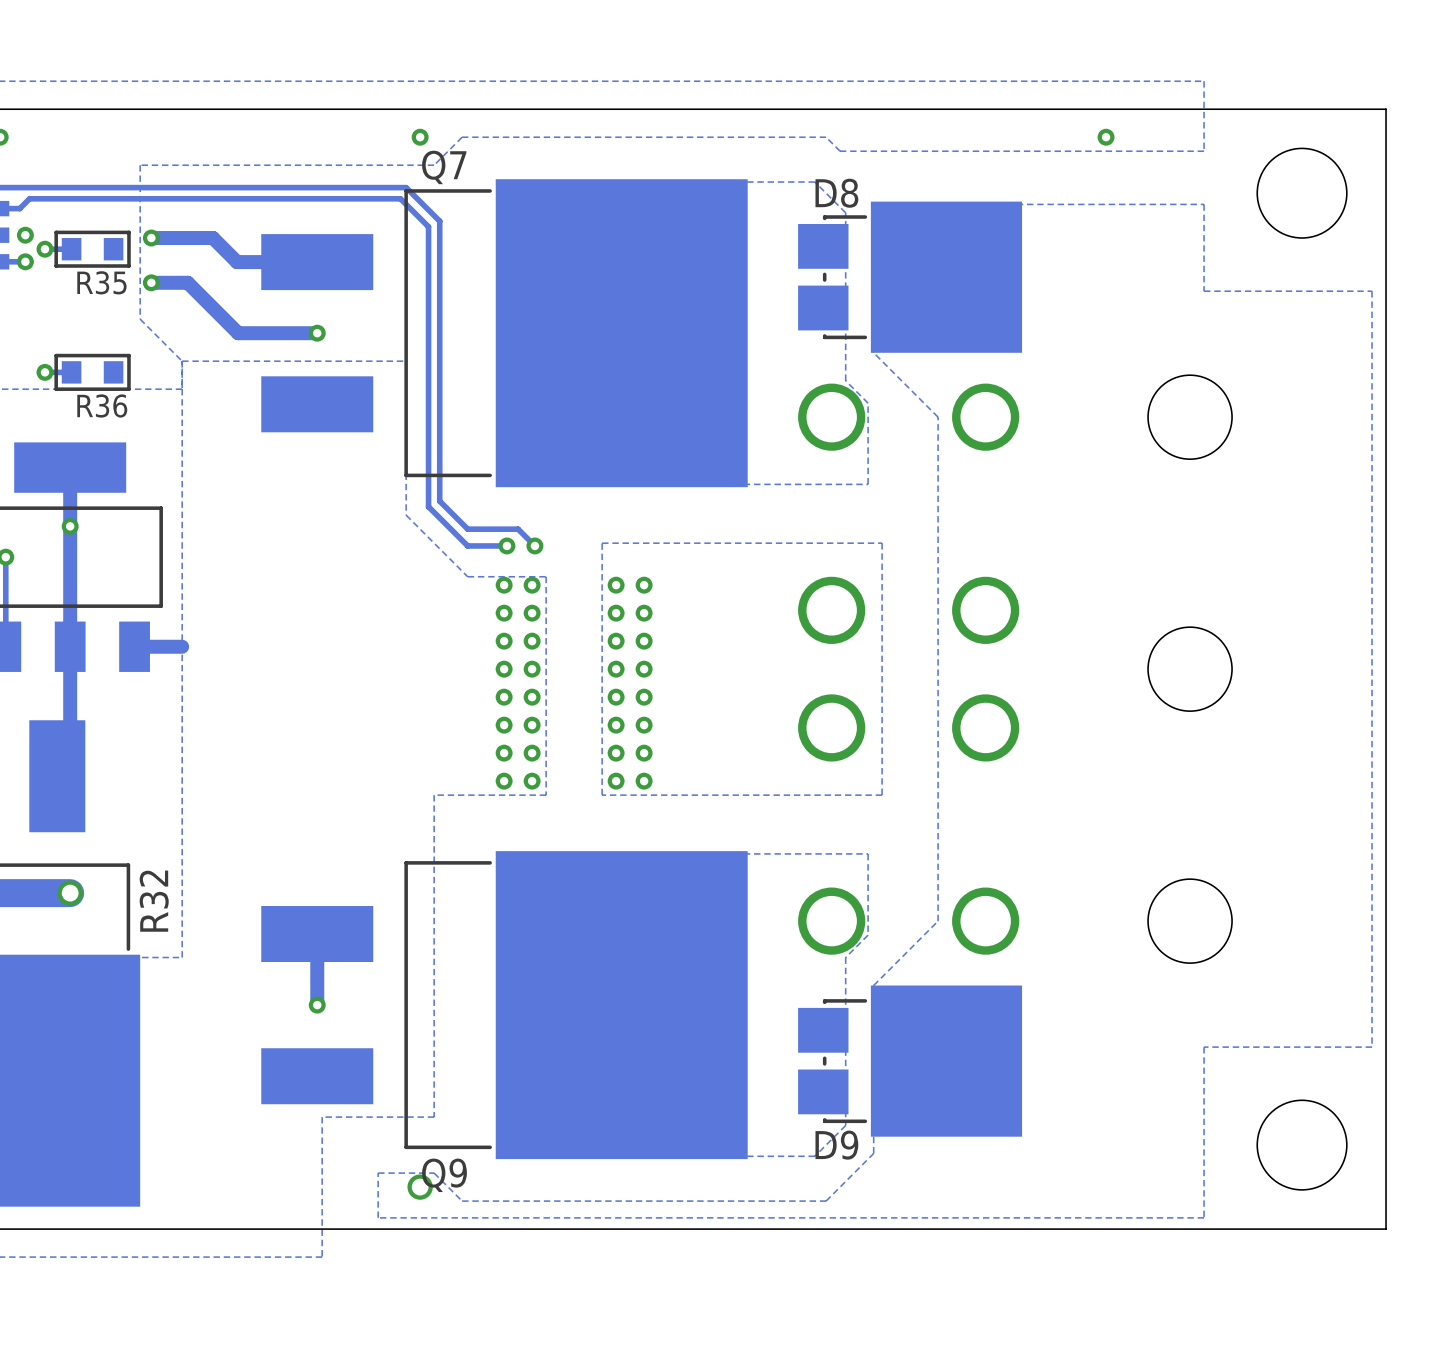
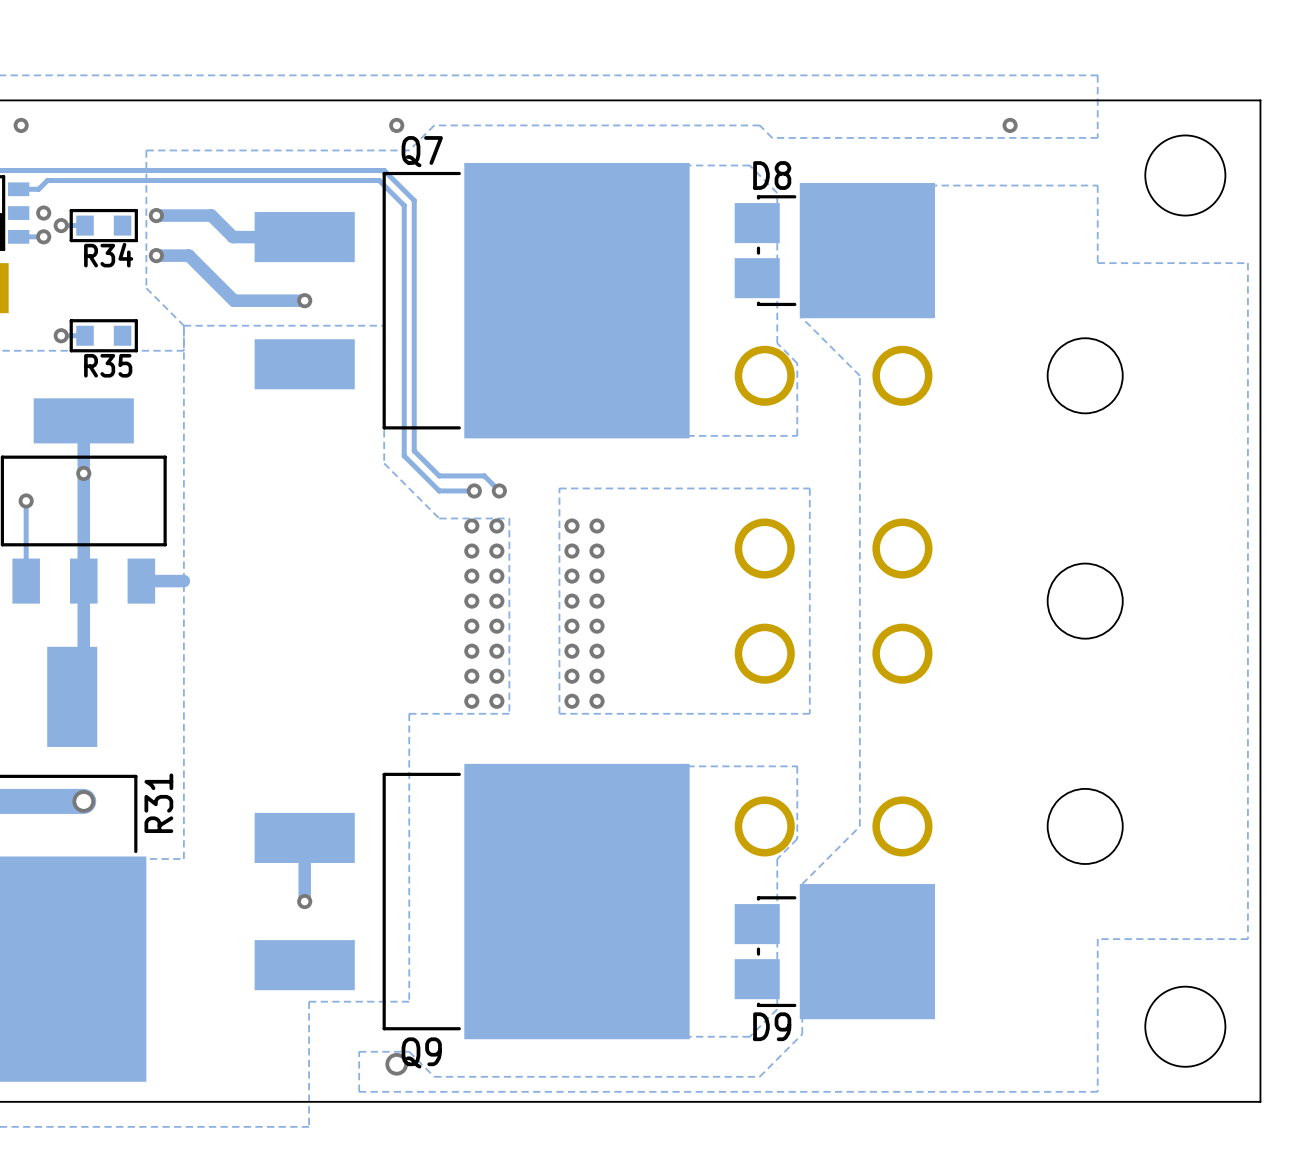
R35 name: R35 (101, 282) -> R34 (108, 255)
R36 name: R36 (102, 406) -> R35 (108, 365)
R32 name: R32 (154, 901) -> R31 (158, 803)

